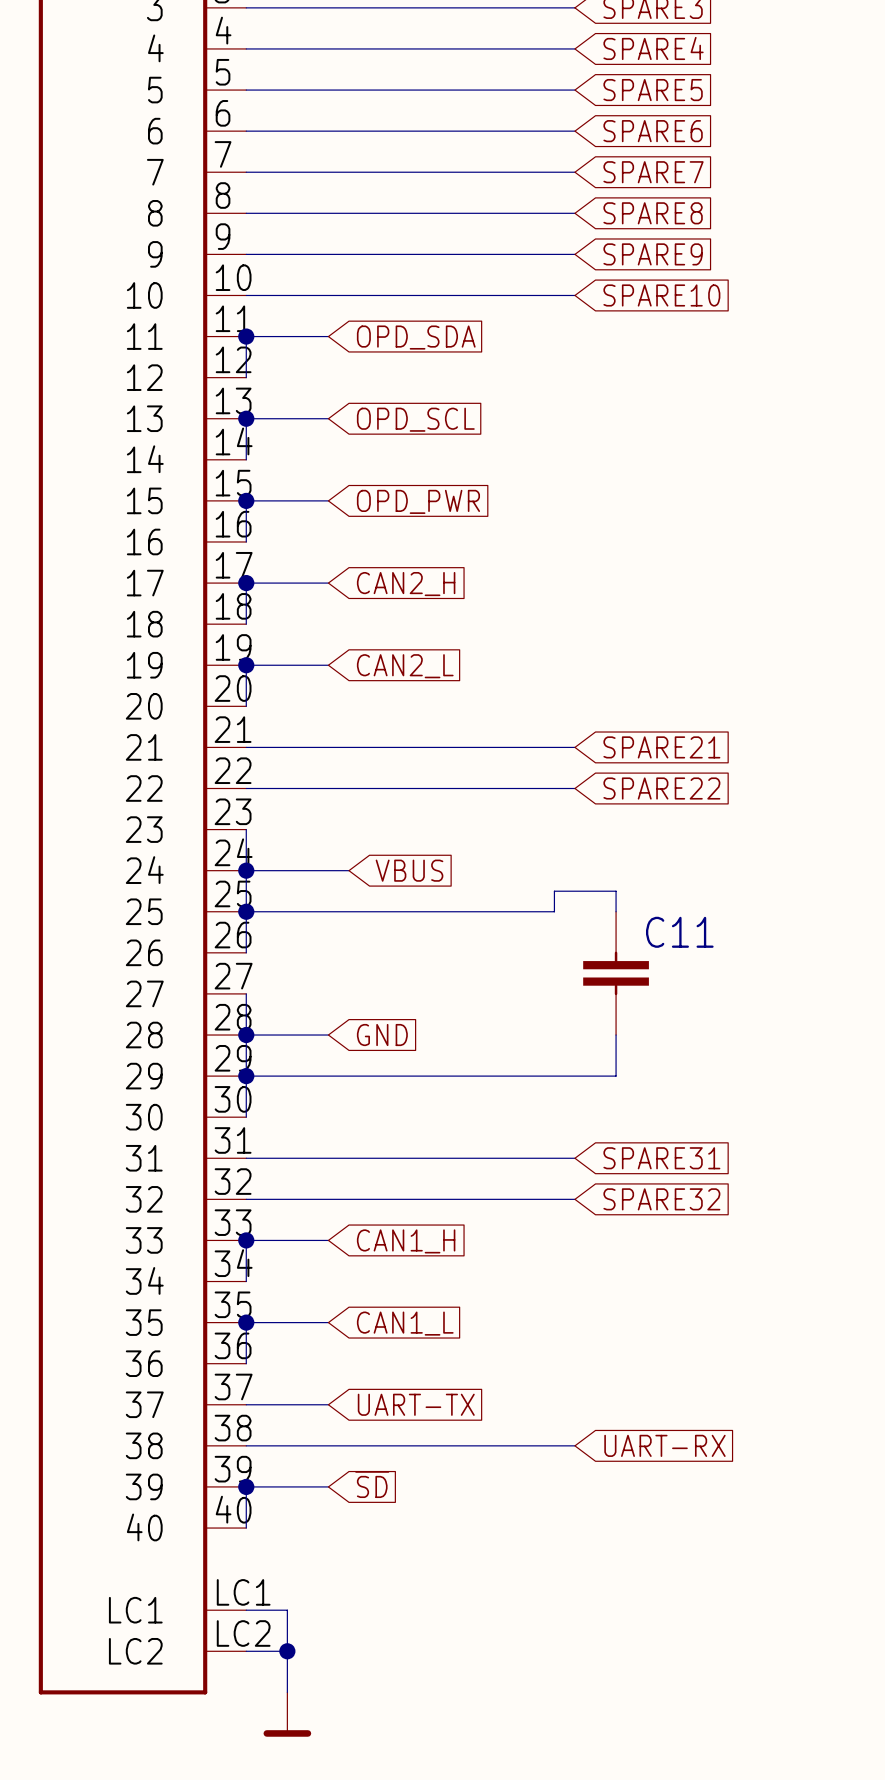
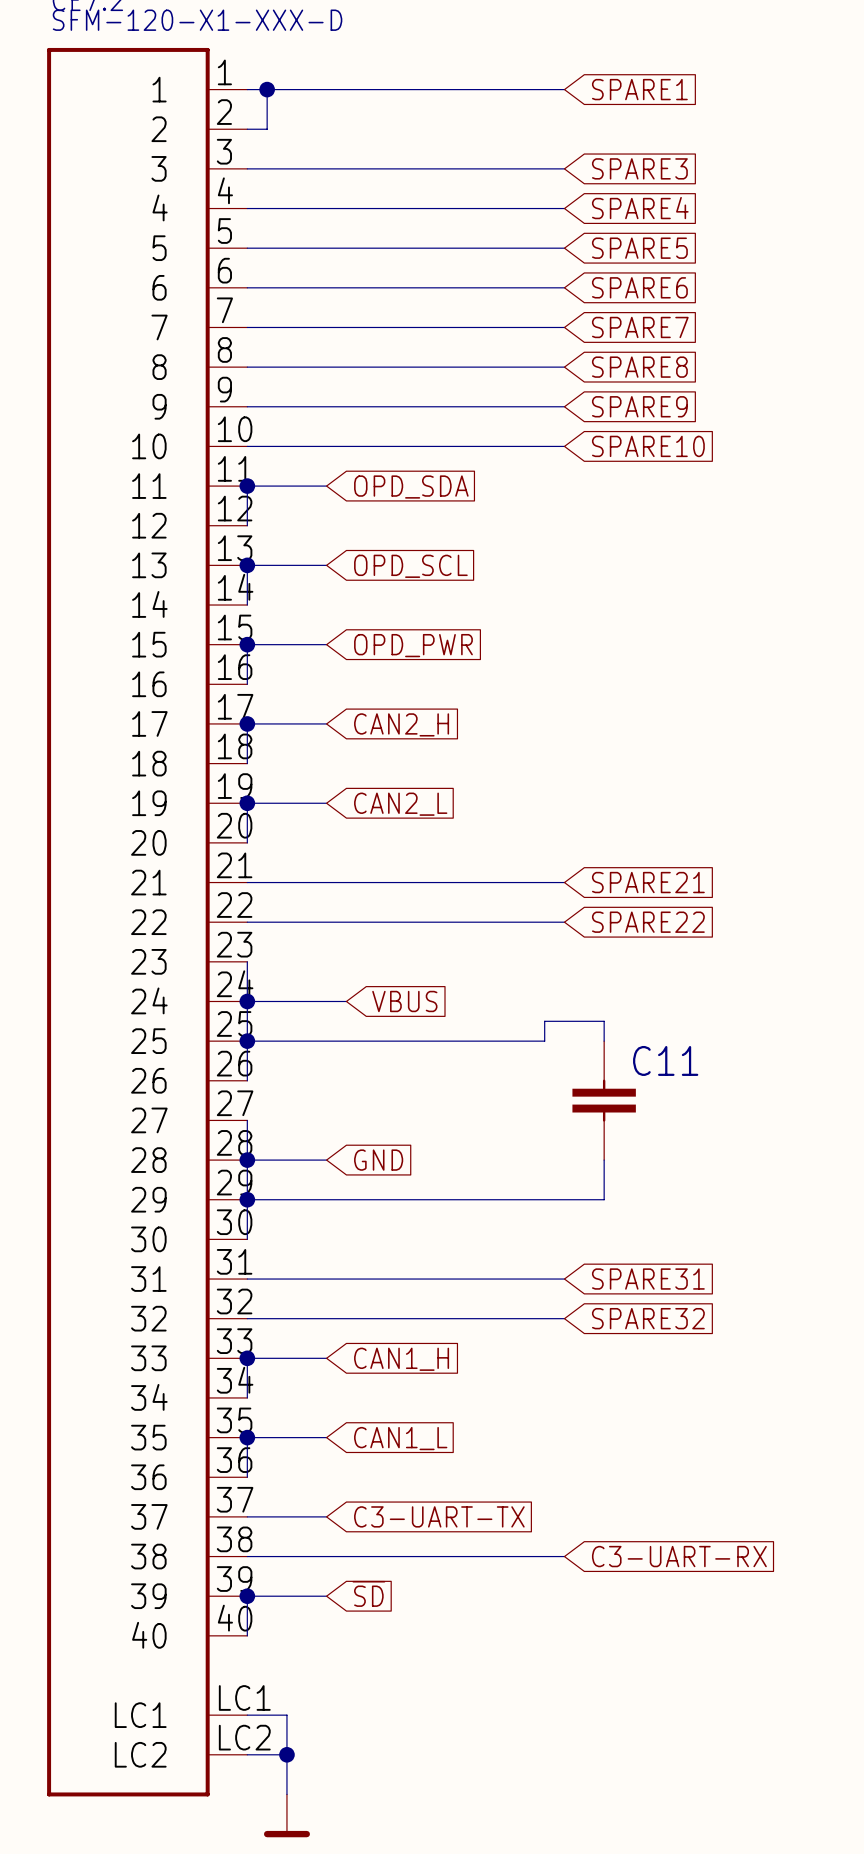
global label: UART-TX (416, 1404) -> C3-UART-TX (439, 1516)
global label: UART-RX (664, 1445) -> C3-UART-RX (679, 1556)

